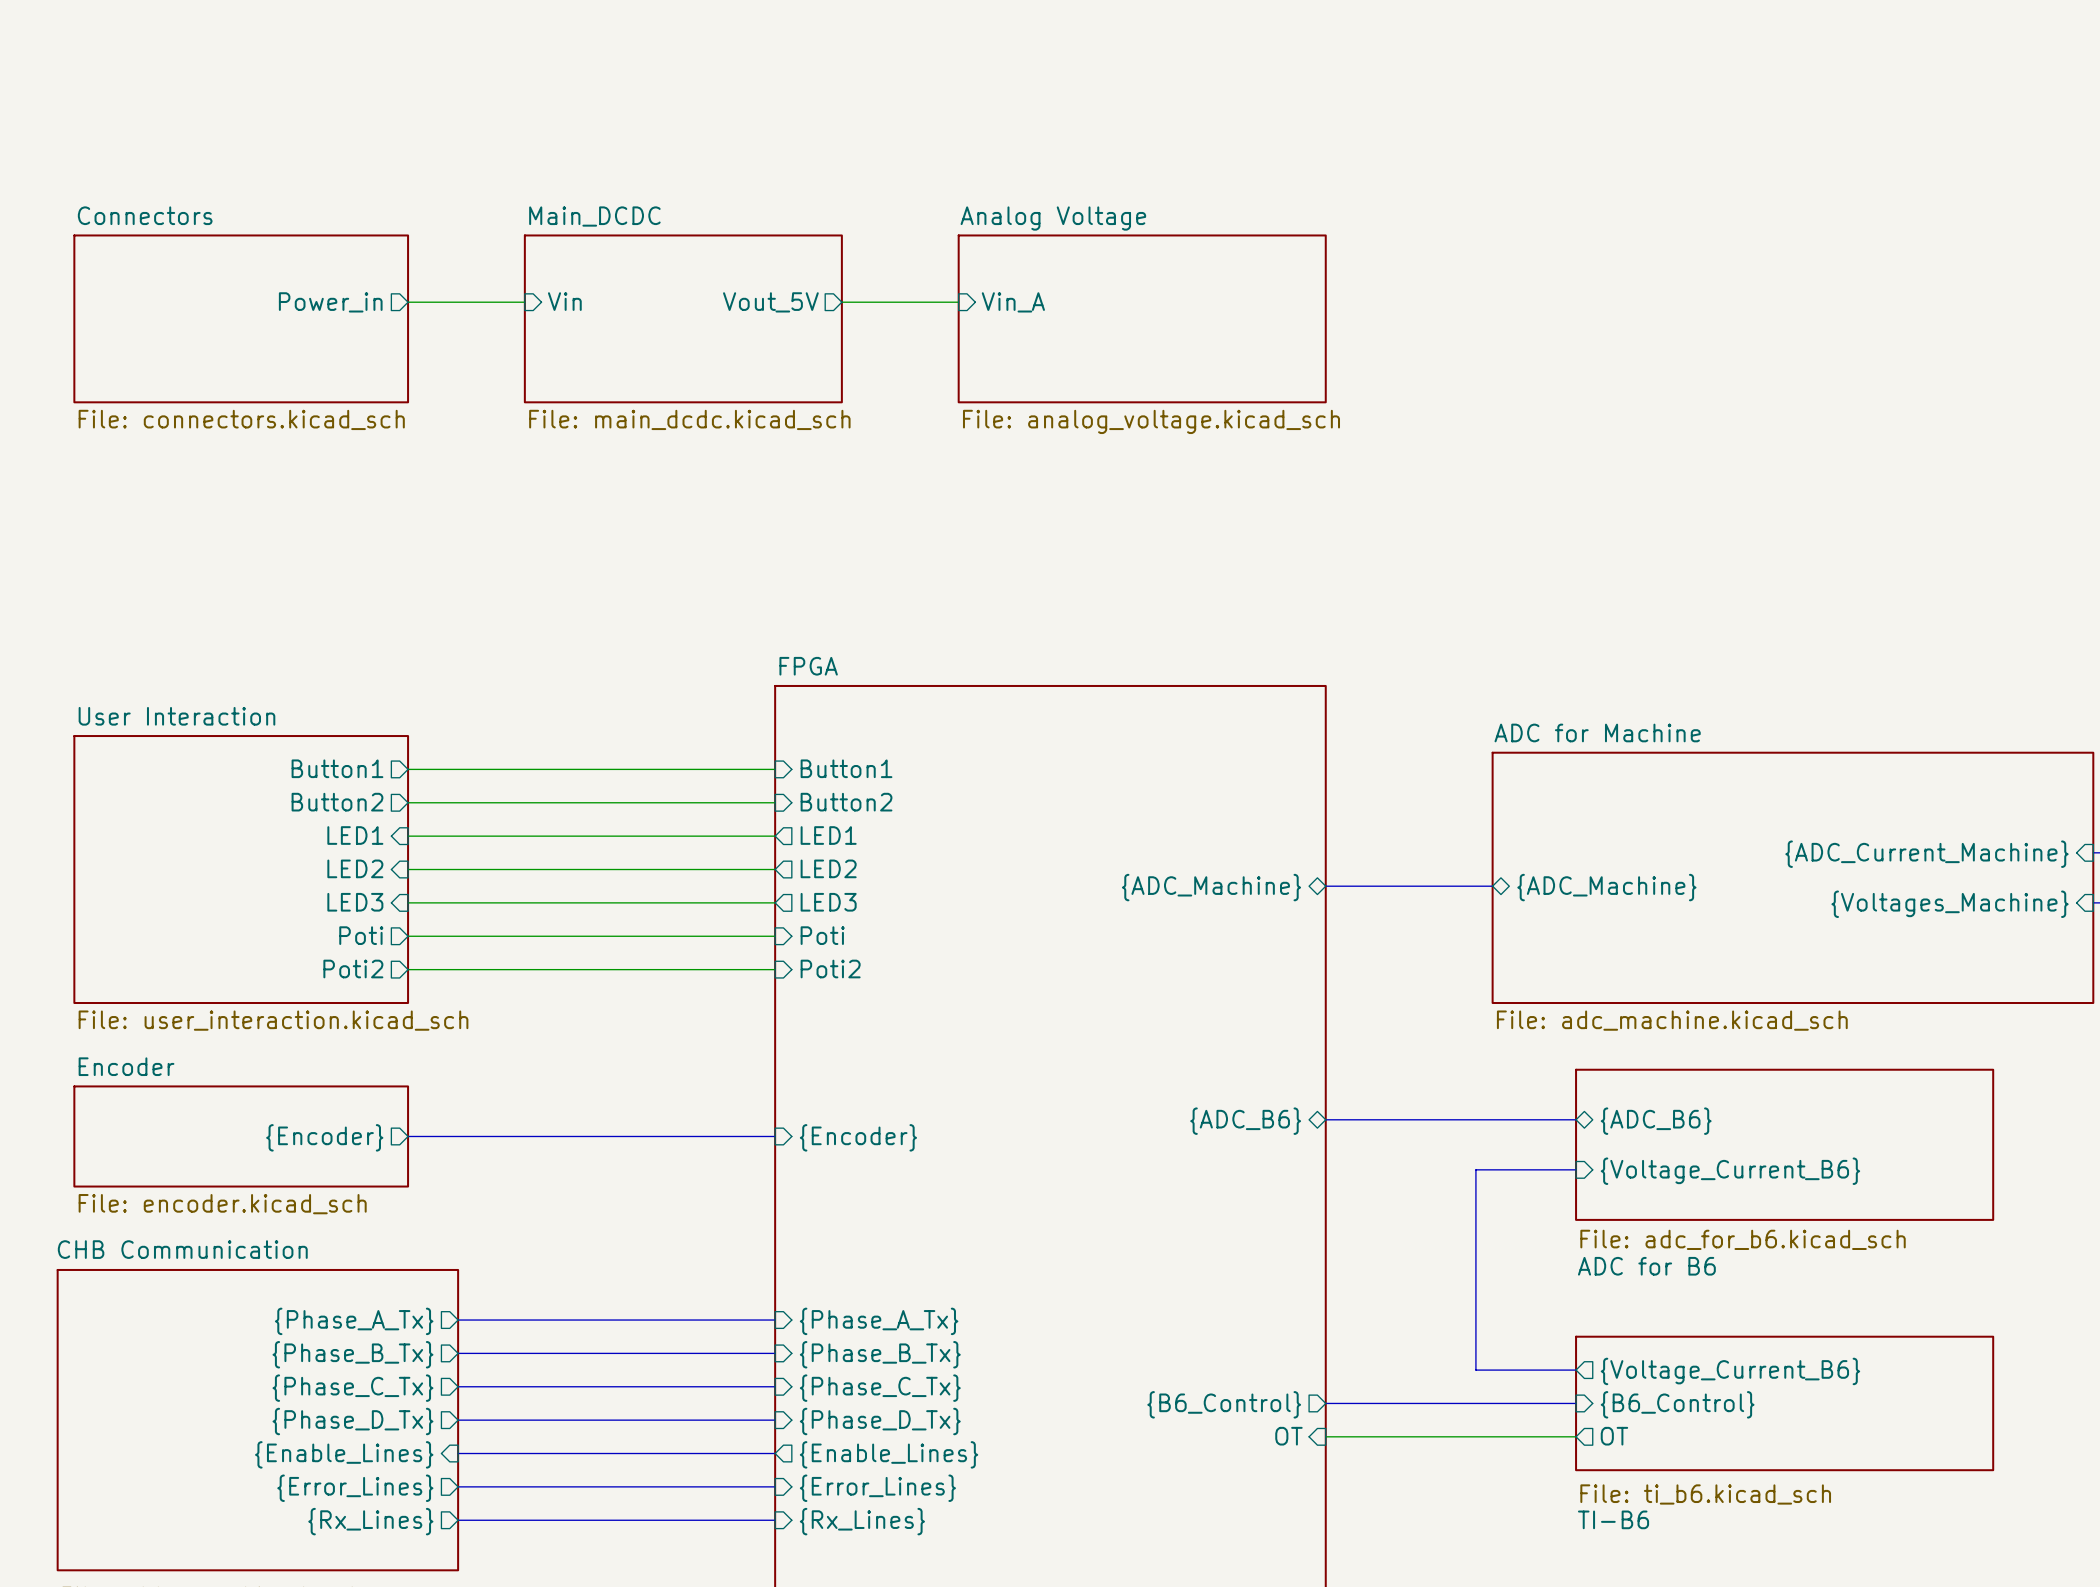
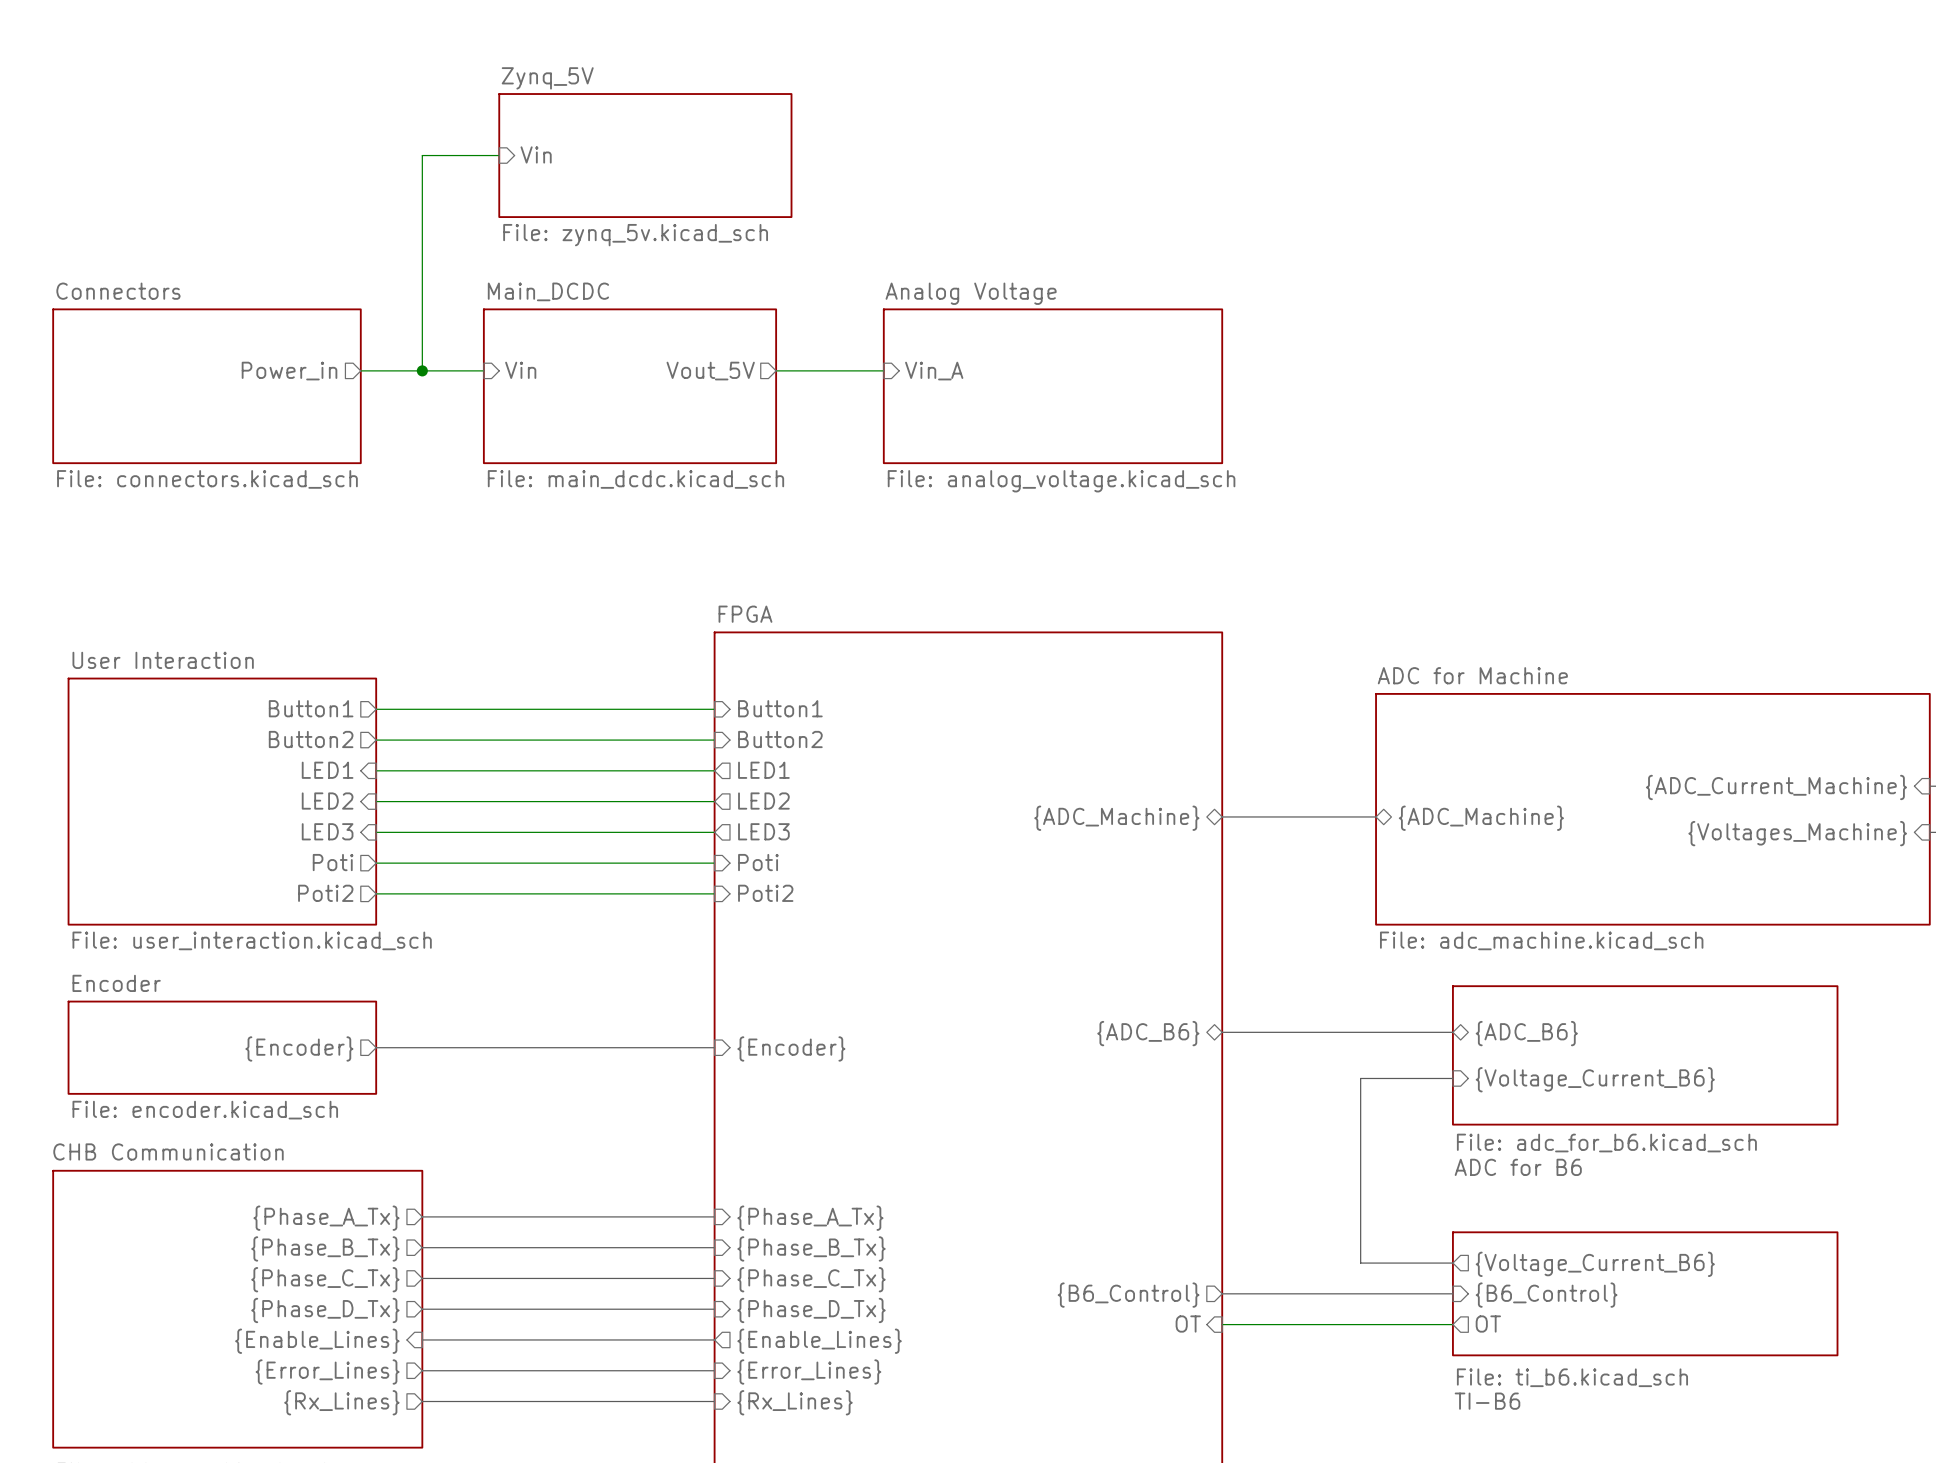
wire: none -> (499, 155) (422, 155) (422, 370)
sheet pin: none -> Vin (536, 154)
sheet Zynq_5V: none -> File: zynq_5v.kicad_sch (645, 155)
sheet pin: Vin (564, 301) -> none
sheet pin position: Power_in (330, 302) -> Power_in (289, 371)
wire: (408, 302) (524, 302) -> none
sheet pin position: Vout_5V (770, 302) -> Vout_5V (710, 371)
wire: (841, 302) (958, 302) -> (776, 370) (883, 370)
sheet pin position: Vin_A (1013, 302) -> Vin_A (934, 371)
sheet Connectors position: (241, 318) -> (206, 386)
sheet Main_DCDC position: (683, 318) -> (629, 386)
sheet Analog Voltage position: (1142, 318) -> (1053, 386)
sheet pin: none -> Vin (520, 370)
wire: none -> (360, 370) (483, 370)
junction: none -> (422, 370)

